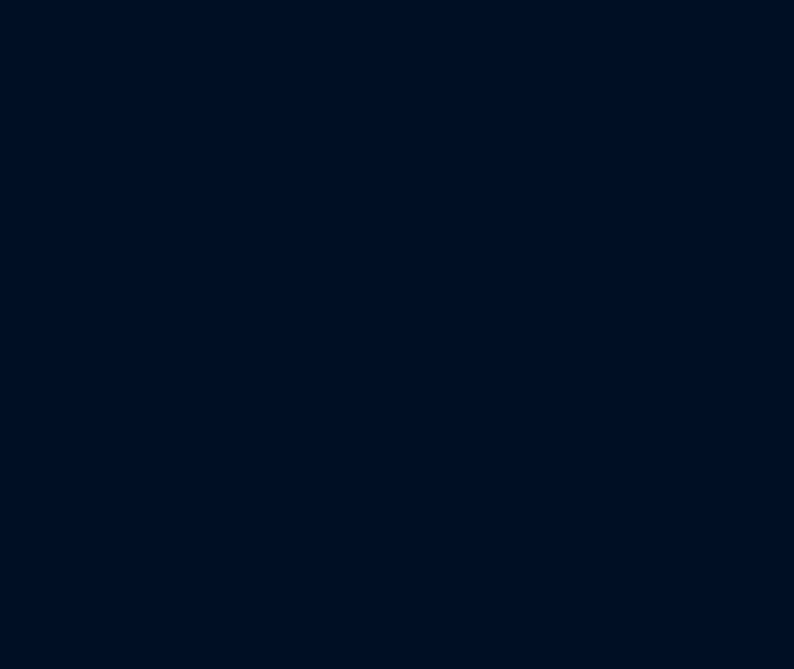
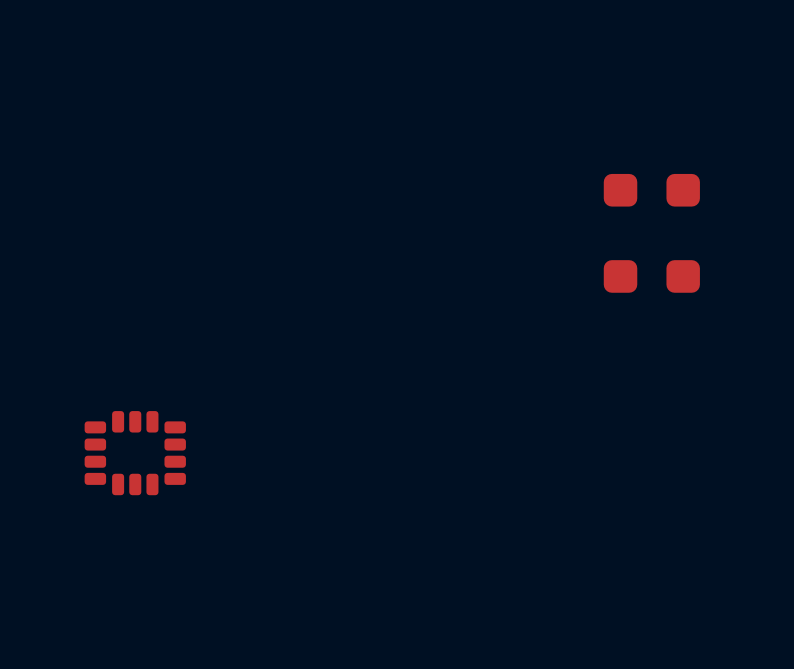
part: none -> (651, 190)
part: none -> (651, 276)
part: none -> (135, 453)

